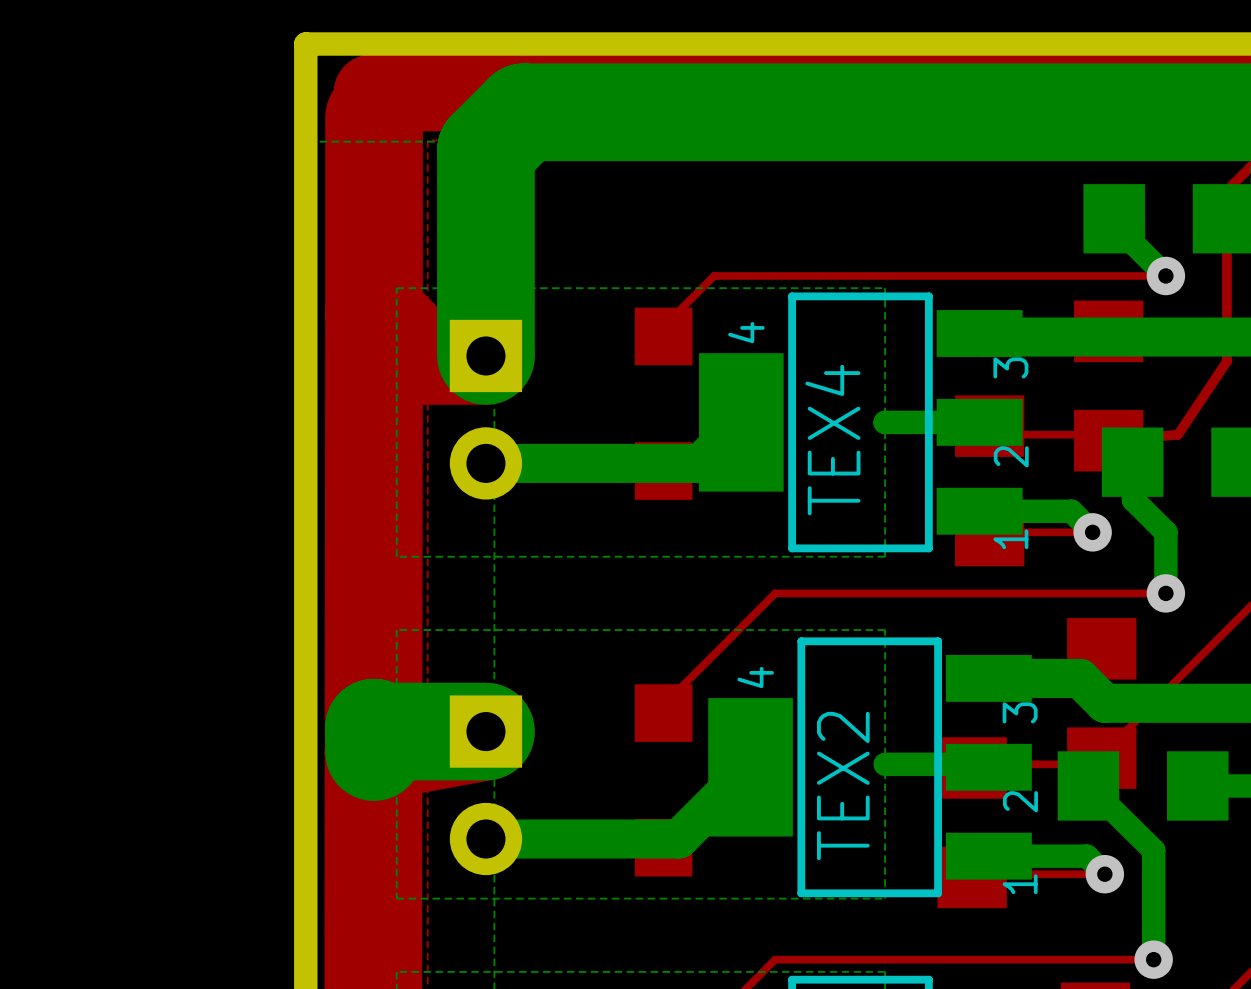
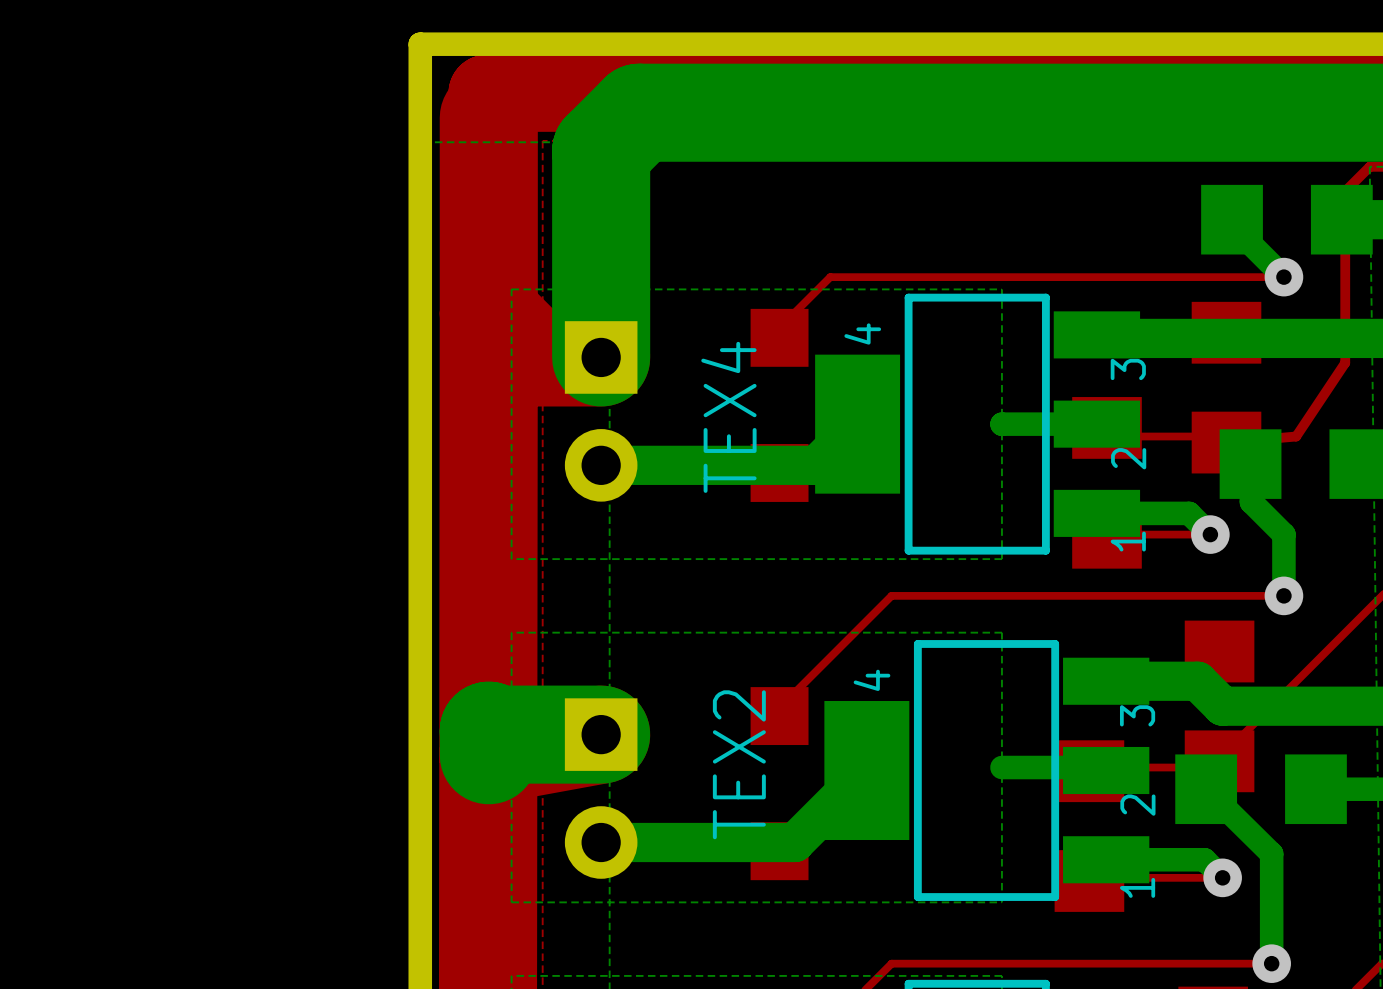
TEX4 name position: TEX4 (832, 440) -> TEX4 (728, 417)
TEX2 name position: TEX2 (843, 786) -> TEX2 (739, 764)

